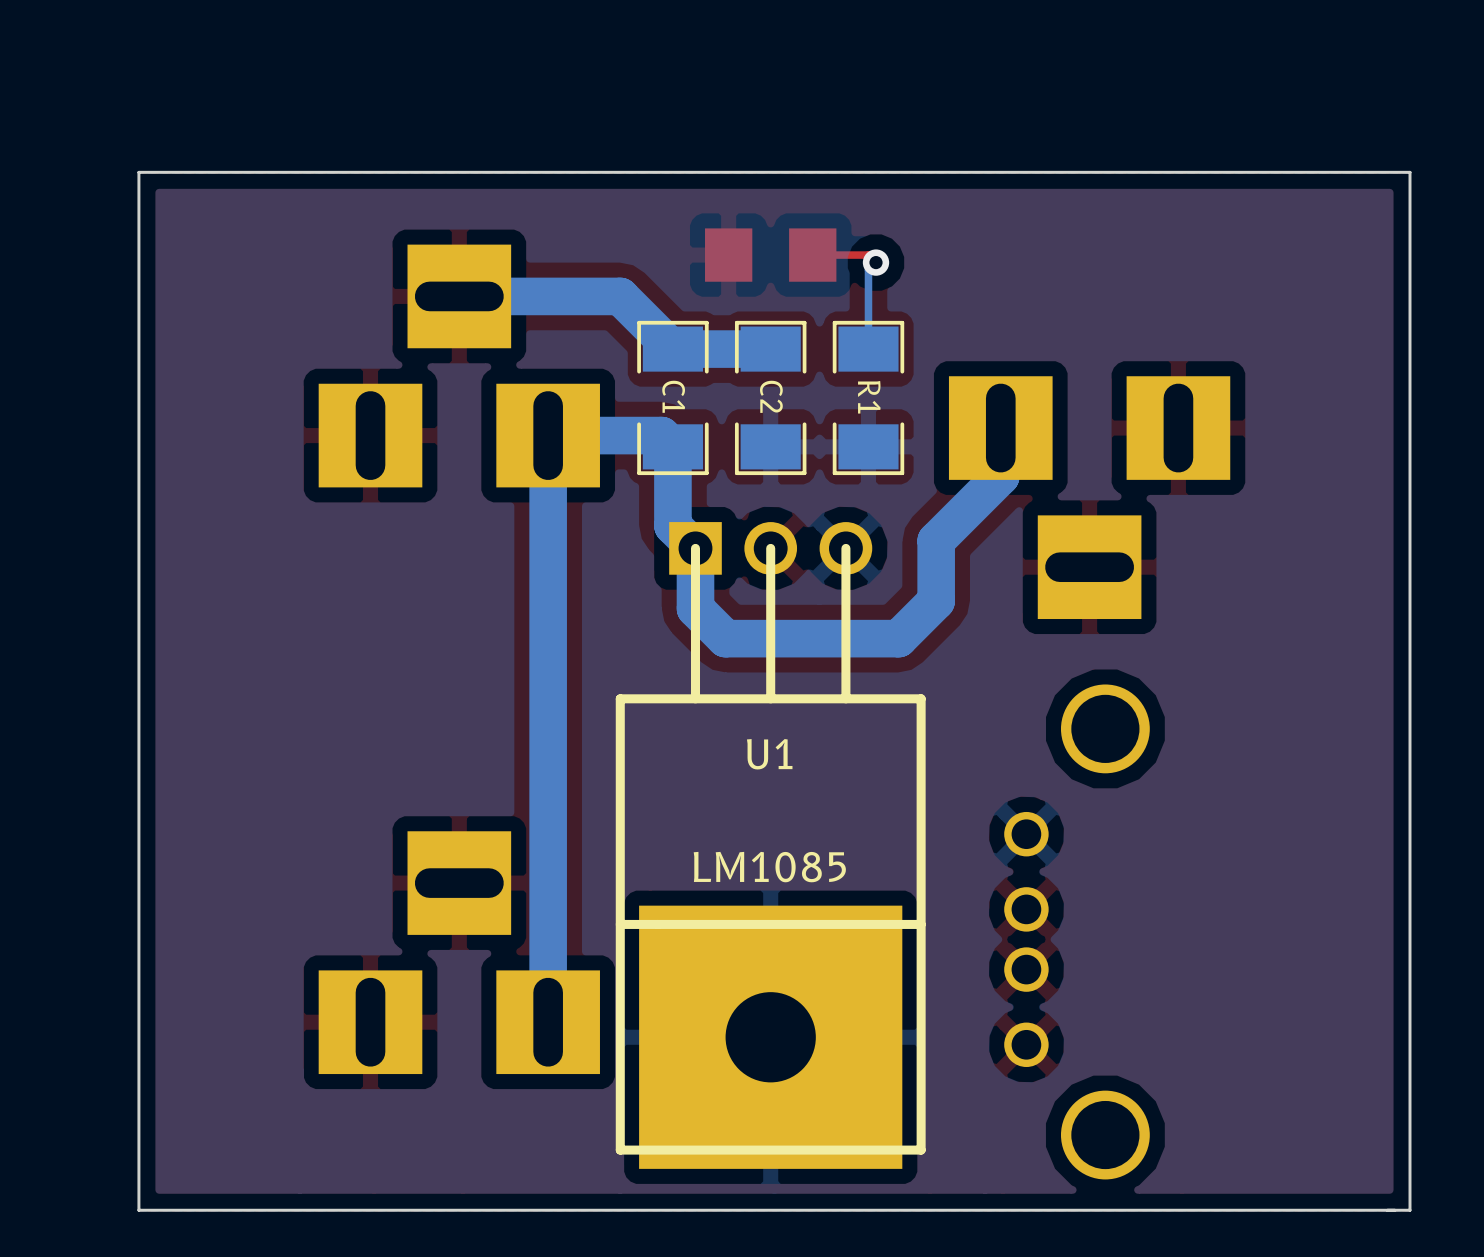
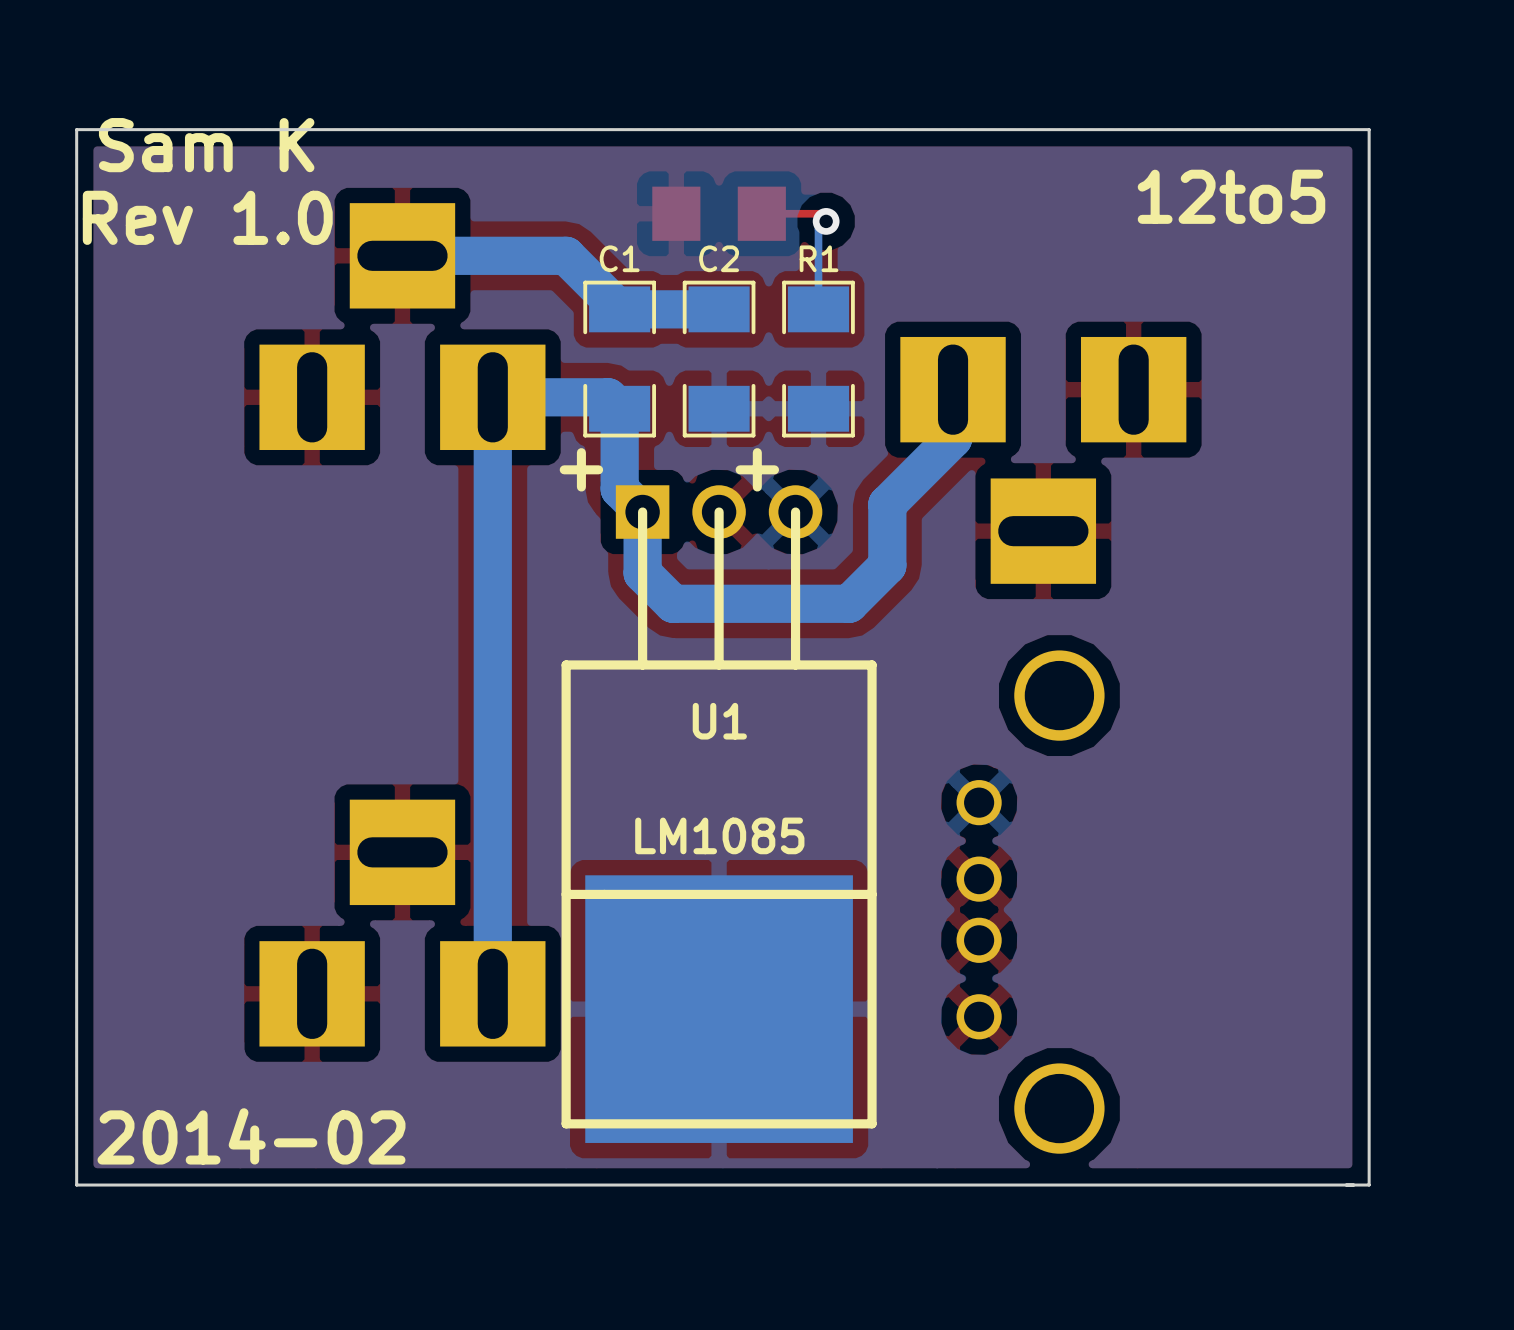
text: none -> Sam K (206, 145)
text: none -> 12to5 (1231, 196)
text: none -> Rev 1.0 (207, 217)
C1 name rotation: 0° (673, 396) -> 90° counterclockwise (619, 258)
C1 name position: C1 (673, 396) -> C1 (619, 258)
C2 name rotation: 0° (771, 396) -> 90° counterclockwise (719, 258)
C2 name position: C2 (771, 396) -> C2 (719, 258)
R1 name rotation: 0° (869, 397) -> 90° counterclockwise (819, 258)
R1 name position: R1 (869, 397) -> R1 (819, 258)
text: none -> + (581, 469)
text: none -> + (757, 469)
U1 footprint: [615, 522, 926, 1169] -> [561, 485, 877, 1143]
text: none -> 2014-02 (251, 1136)

